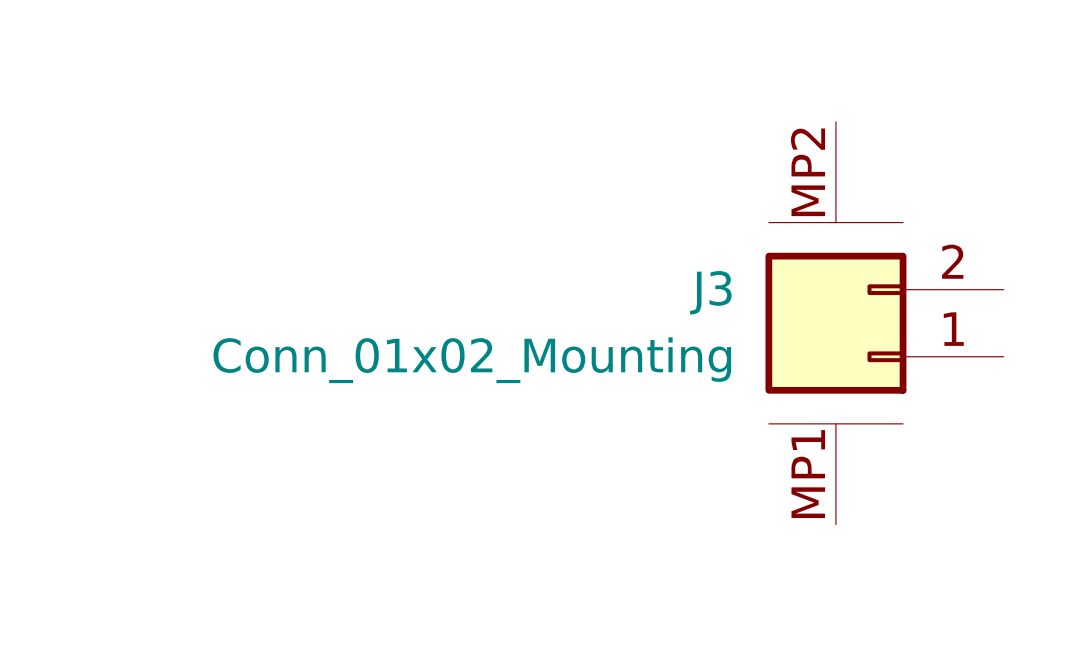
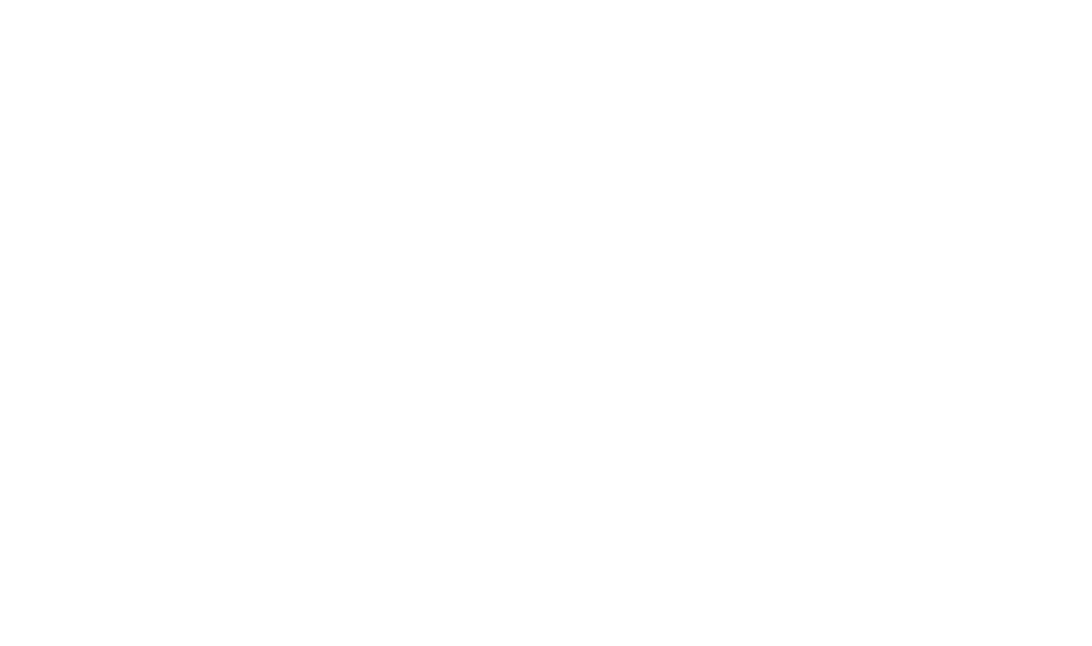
J3: Conn_01x02_Mounting (884, 323) -> none

